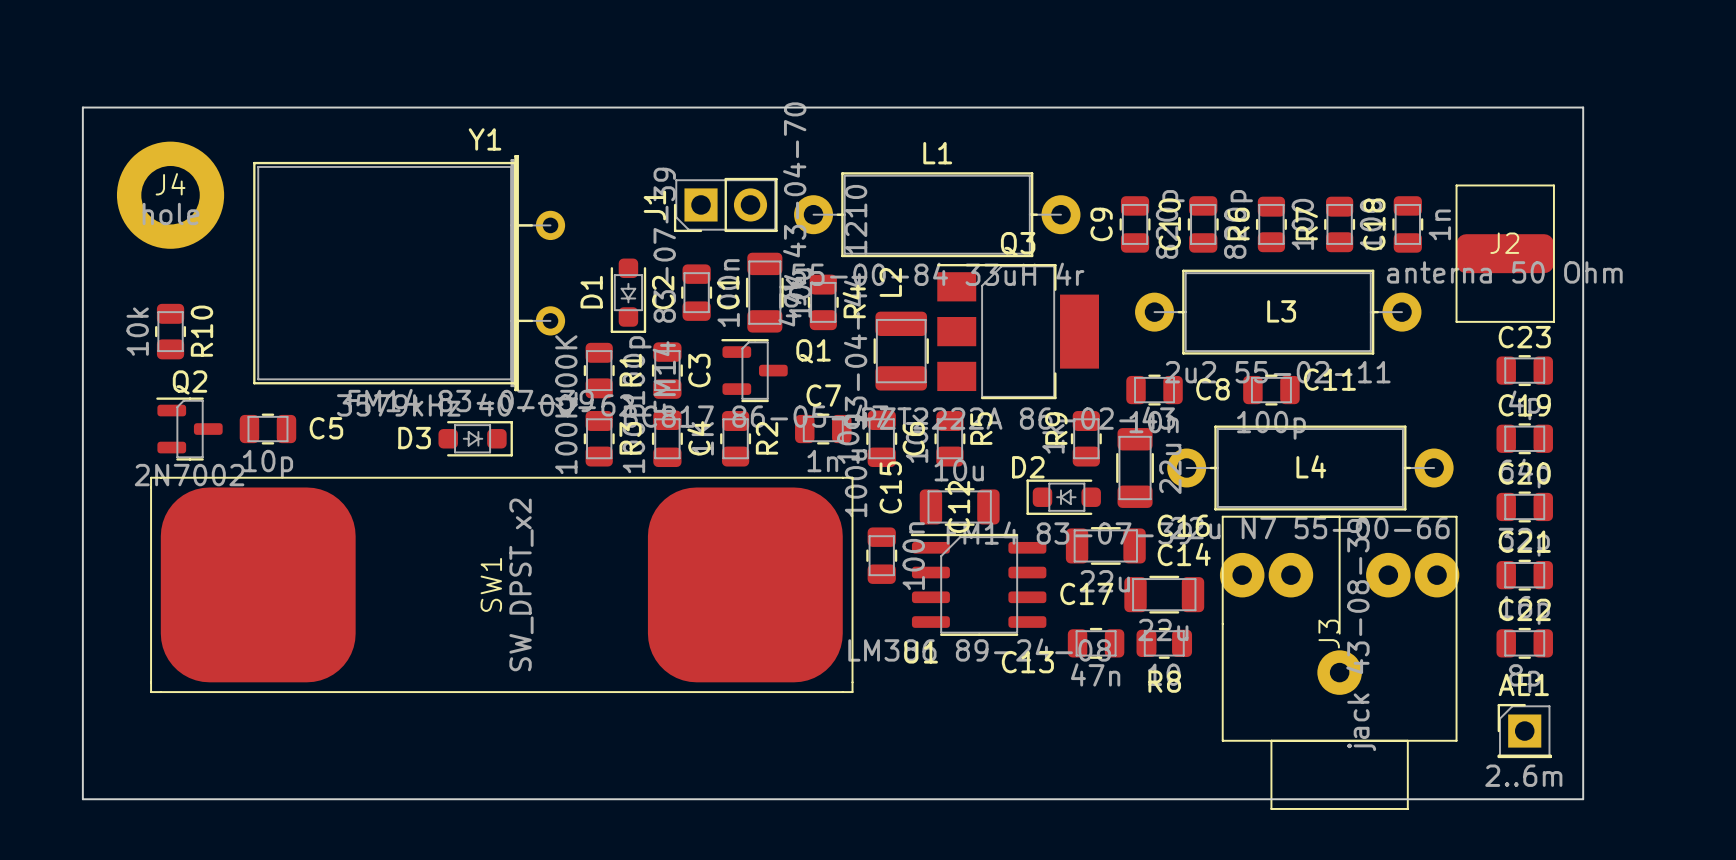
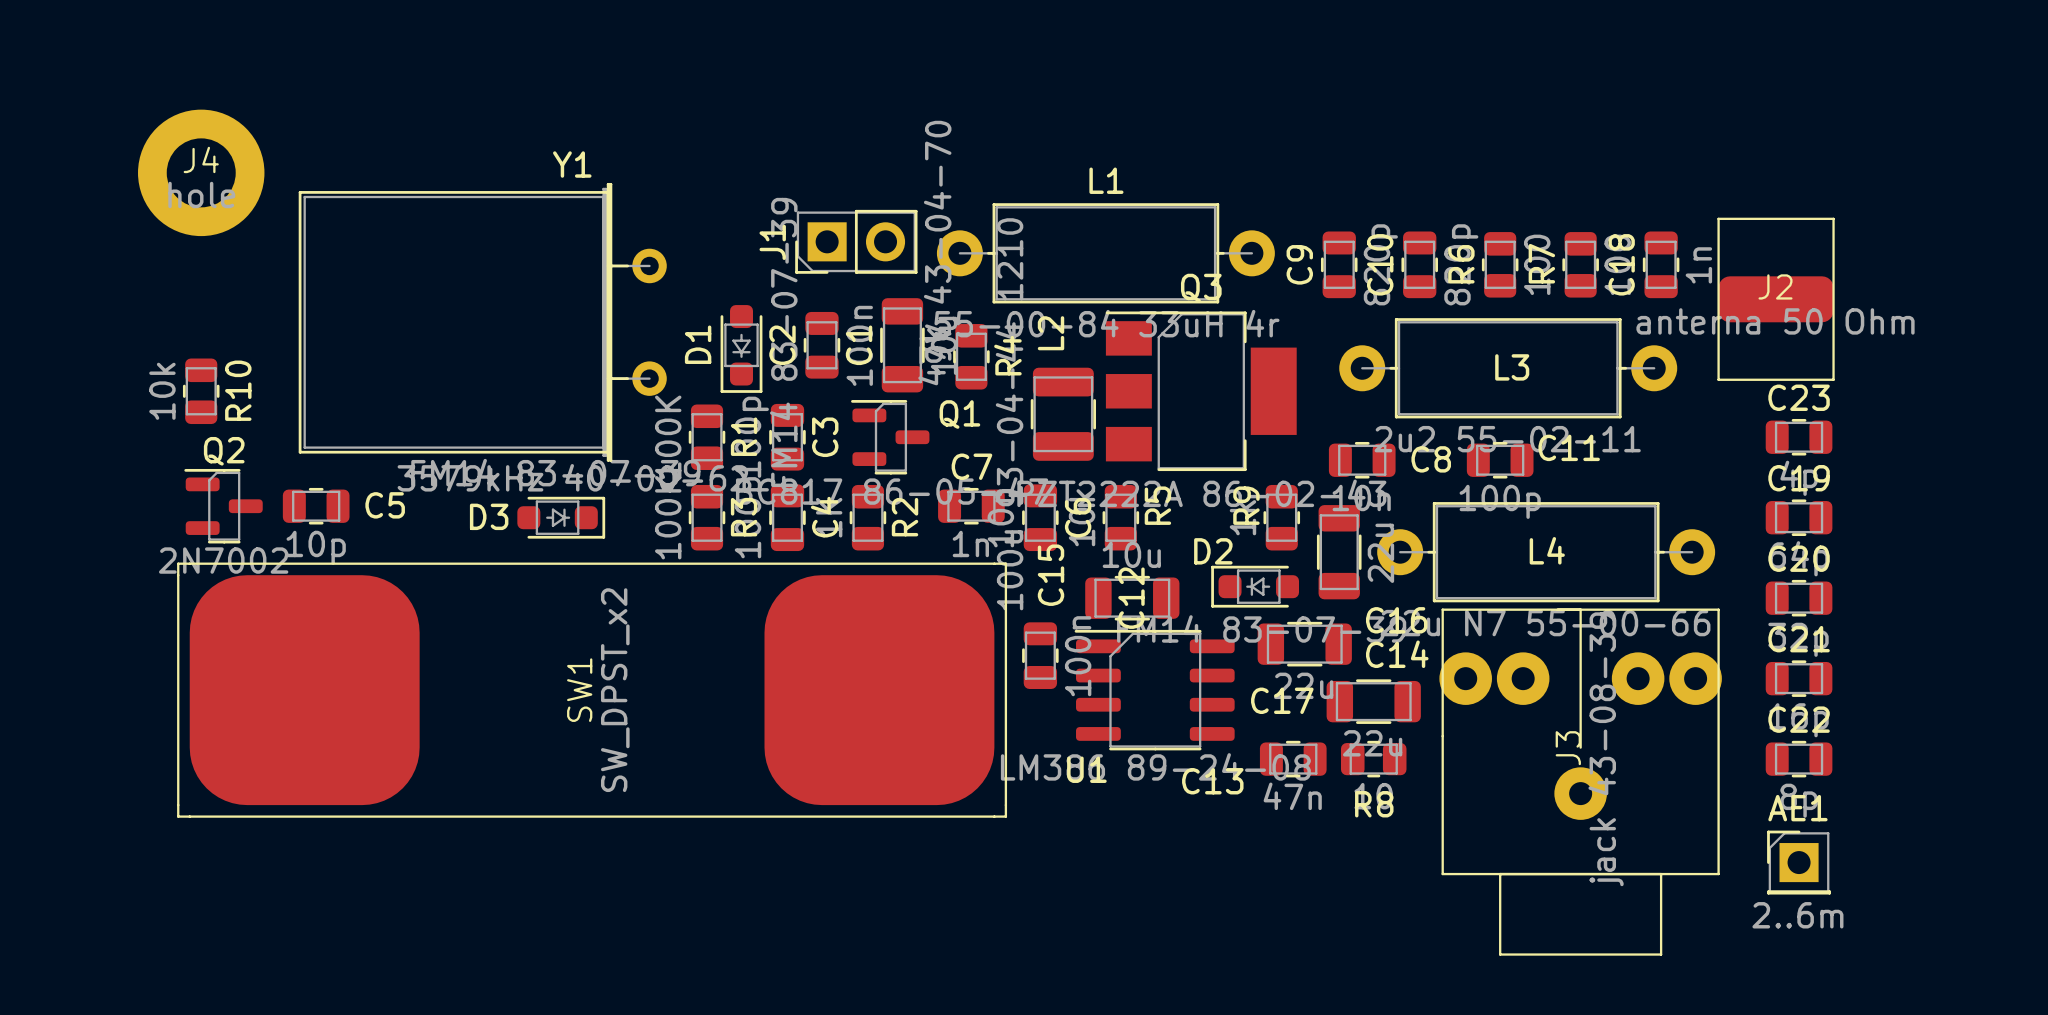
board edge: (82, 107) (82, 799) (1583, 799) (1583, 107) (82, 107) -> none
J4 position: (170, 195) -> (201, 172)

